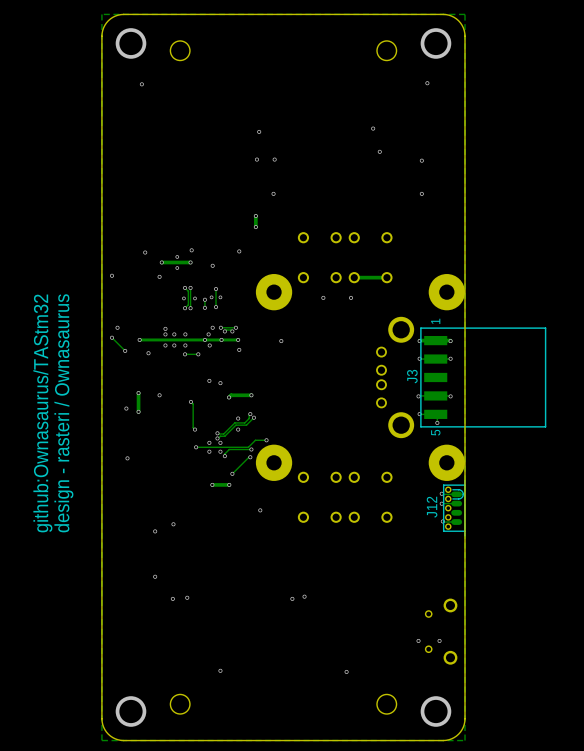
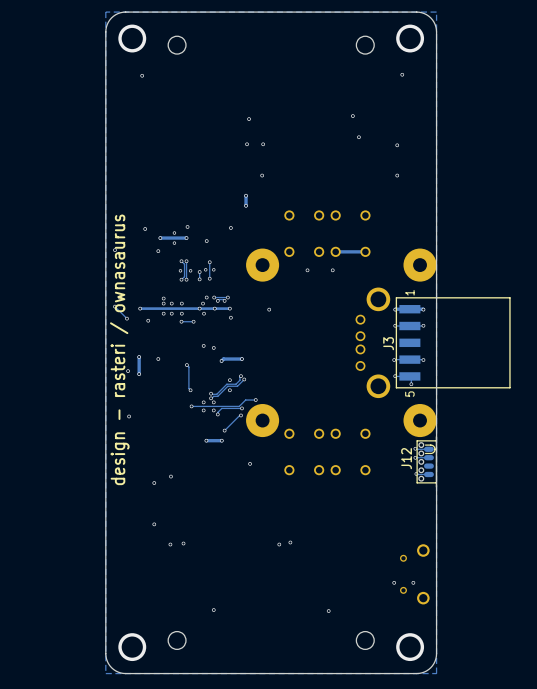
text: github:Ownasaurus/TAStm32 (42, 413) -> none
text: design - rasteri / Ownasaurus (63, 413) -> none
text: none -> design - rasteri / ownasaurus (119, 349)

